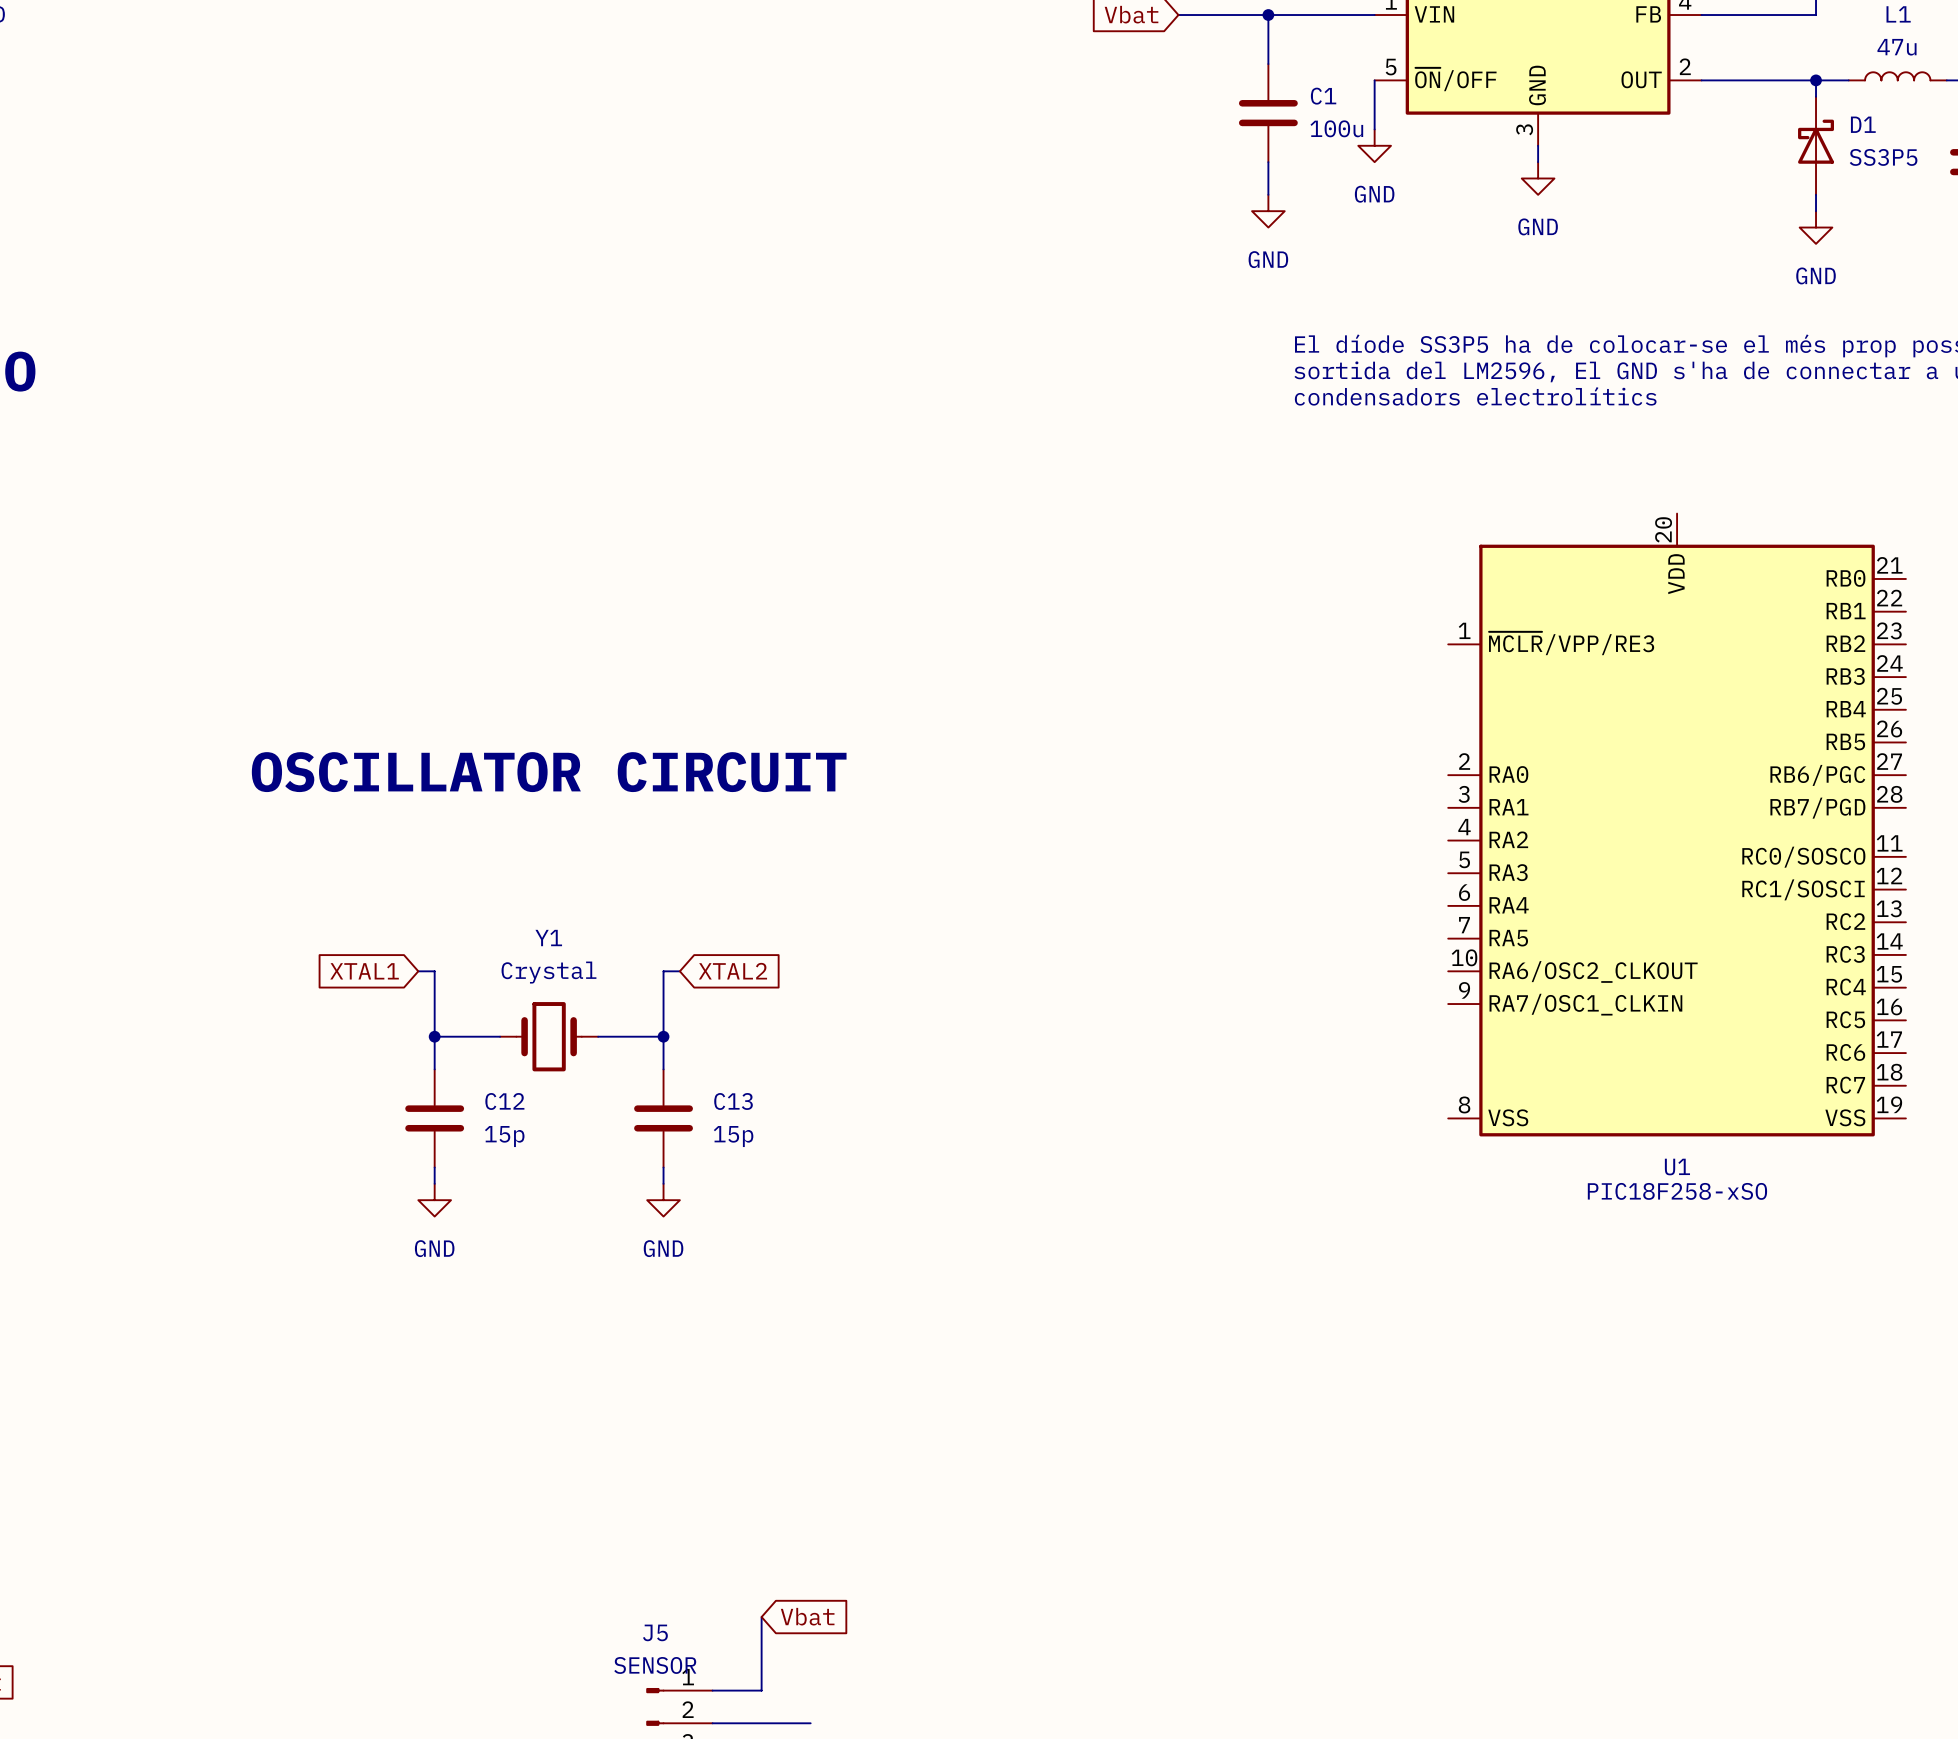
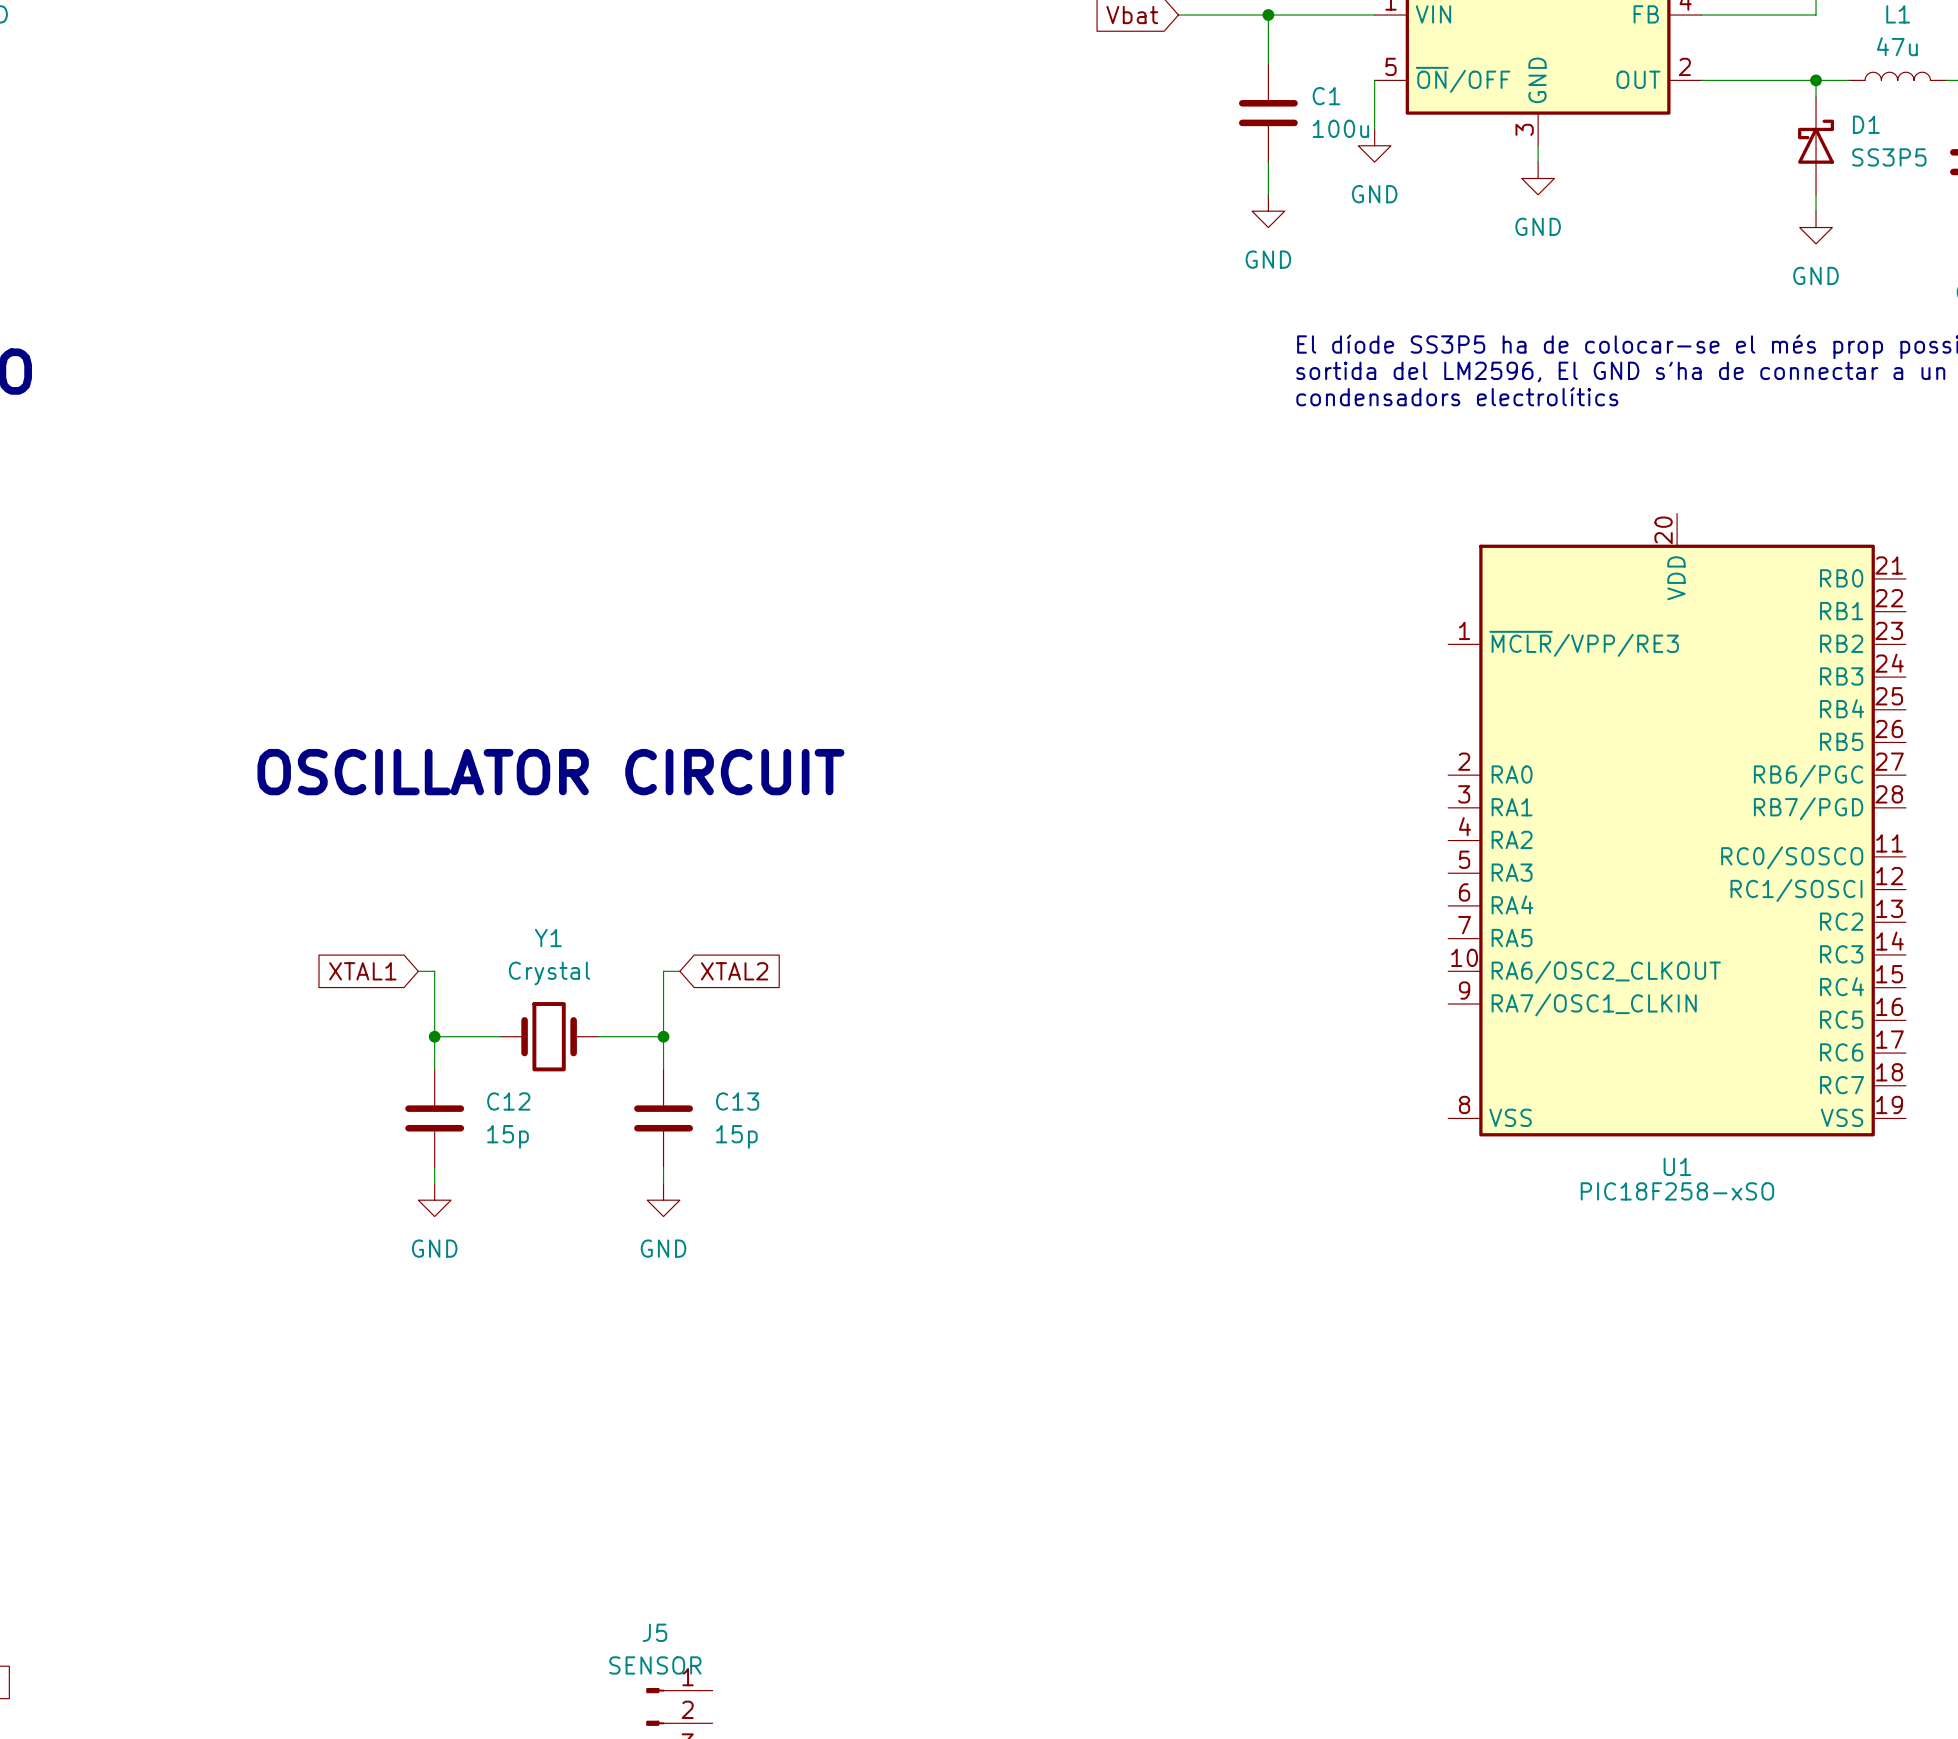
global label: Vbat (807, 1616) -> none
wire: (761, 1617) (761, 1690) (712, 1690) -> none
wire: (712, 1723) (810, 1723) -> none

